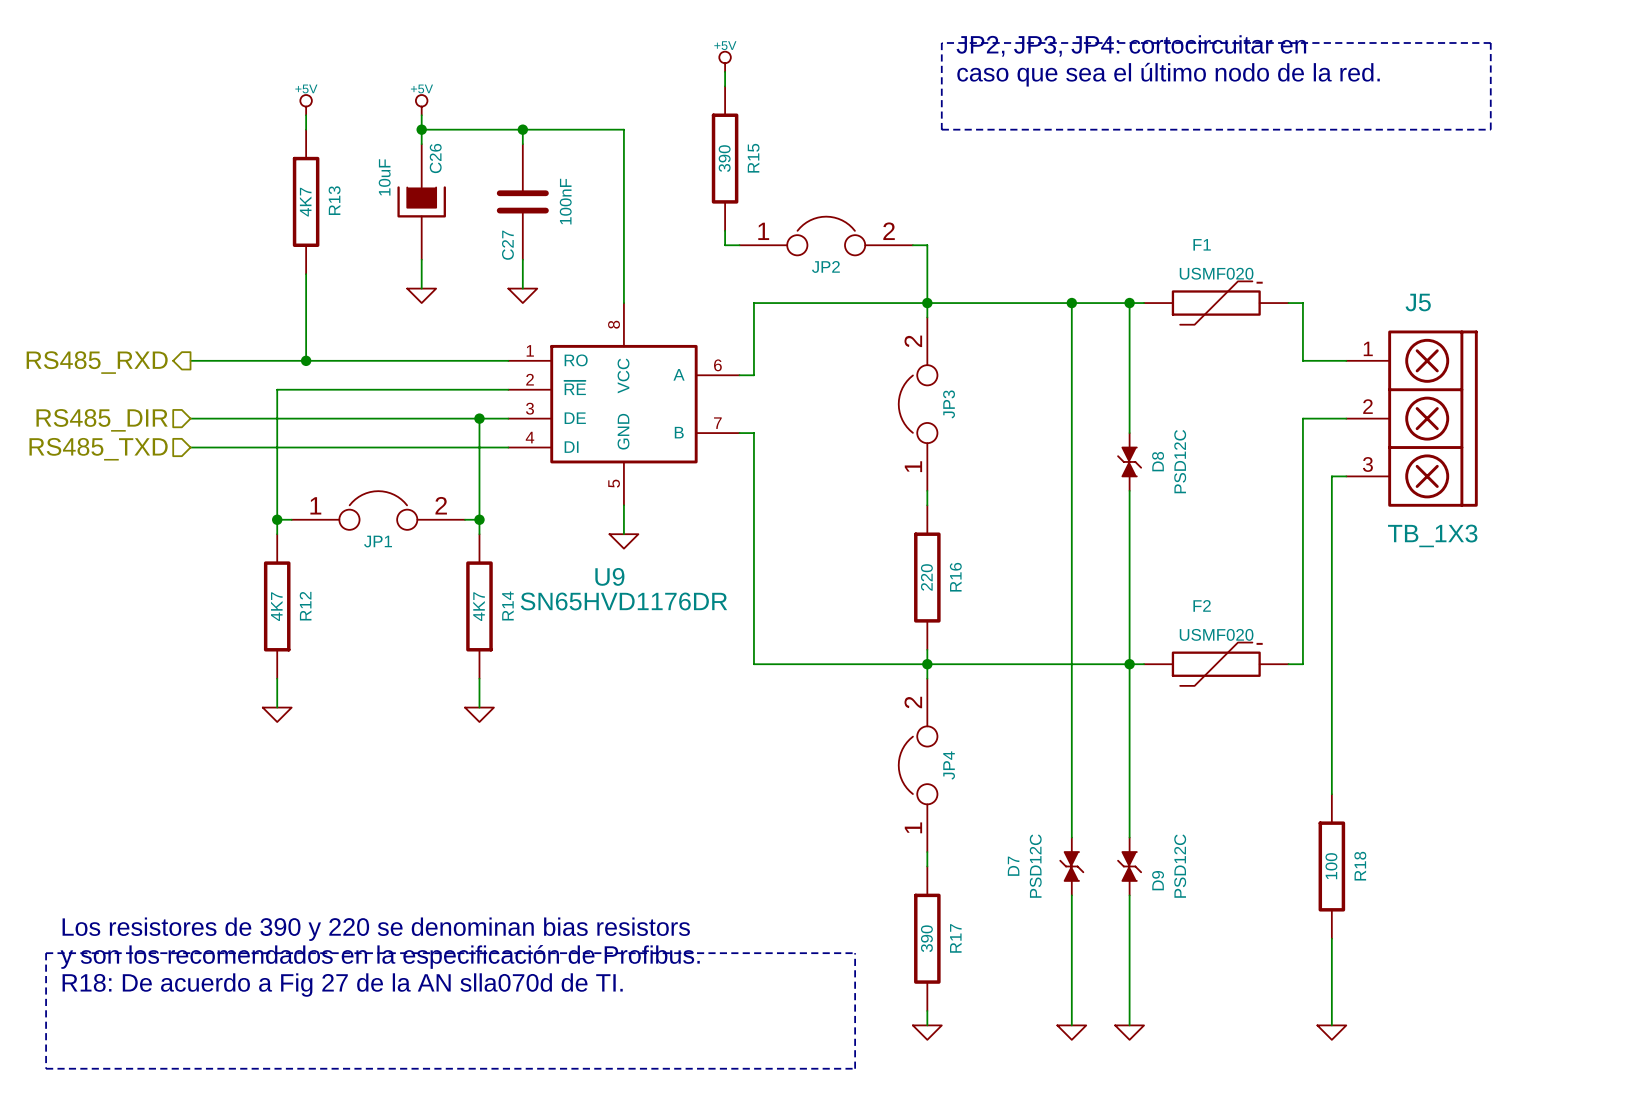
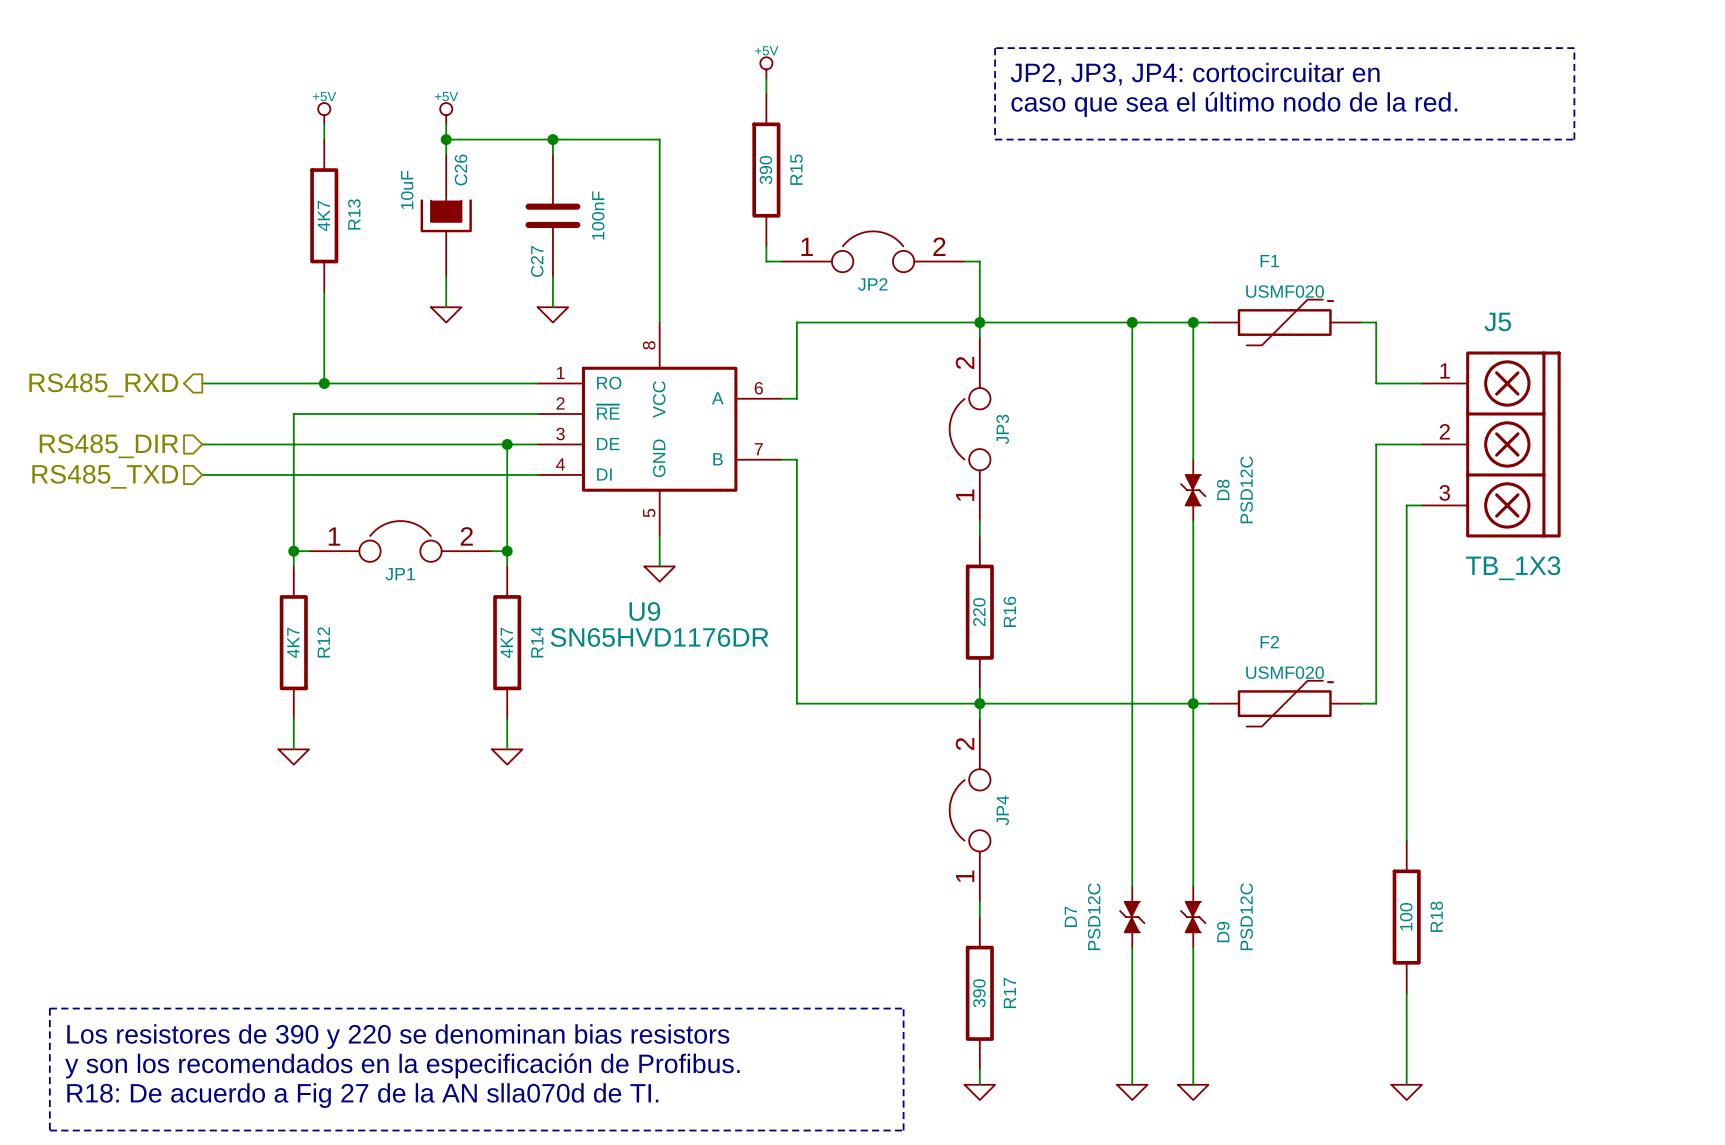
text position: JP2, JP3, JP4: cortocircuitar en (1131, 45) -> JP2, JP3, JP4: cortocircuitar en (1195, 74)
text position: caso que sea el último nodo de la red. (1168, 74) -> caso que sea el último nodo de la red. (1234, 104)
text position: Los resistores de 390 y 220 se denominan bias resistors (376, 929) -> Los resistores de 390 y 220 se denominan bias resistors (398, 1036)
text position: y son los recomendados en la especificación de Profibus. (380, 956) -> y son los recomendados en la especificación de Profibus. (402, 1065)
text position: R18: De acuerdo a Fig 27 de la AN slla070d de TI. (342, 985) -> R18: De acuerdo a Fig 27 de la AN slla070d de TI. (362, 1095)

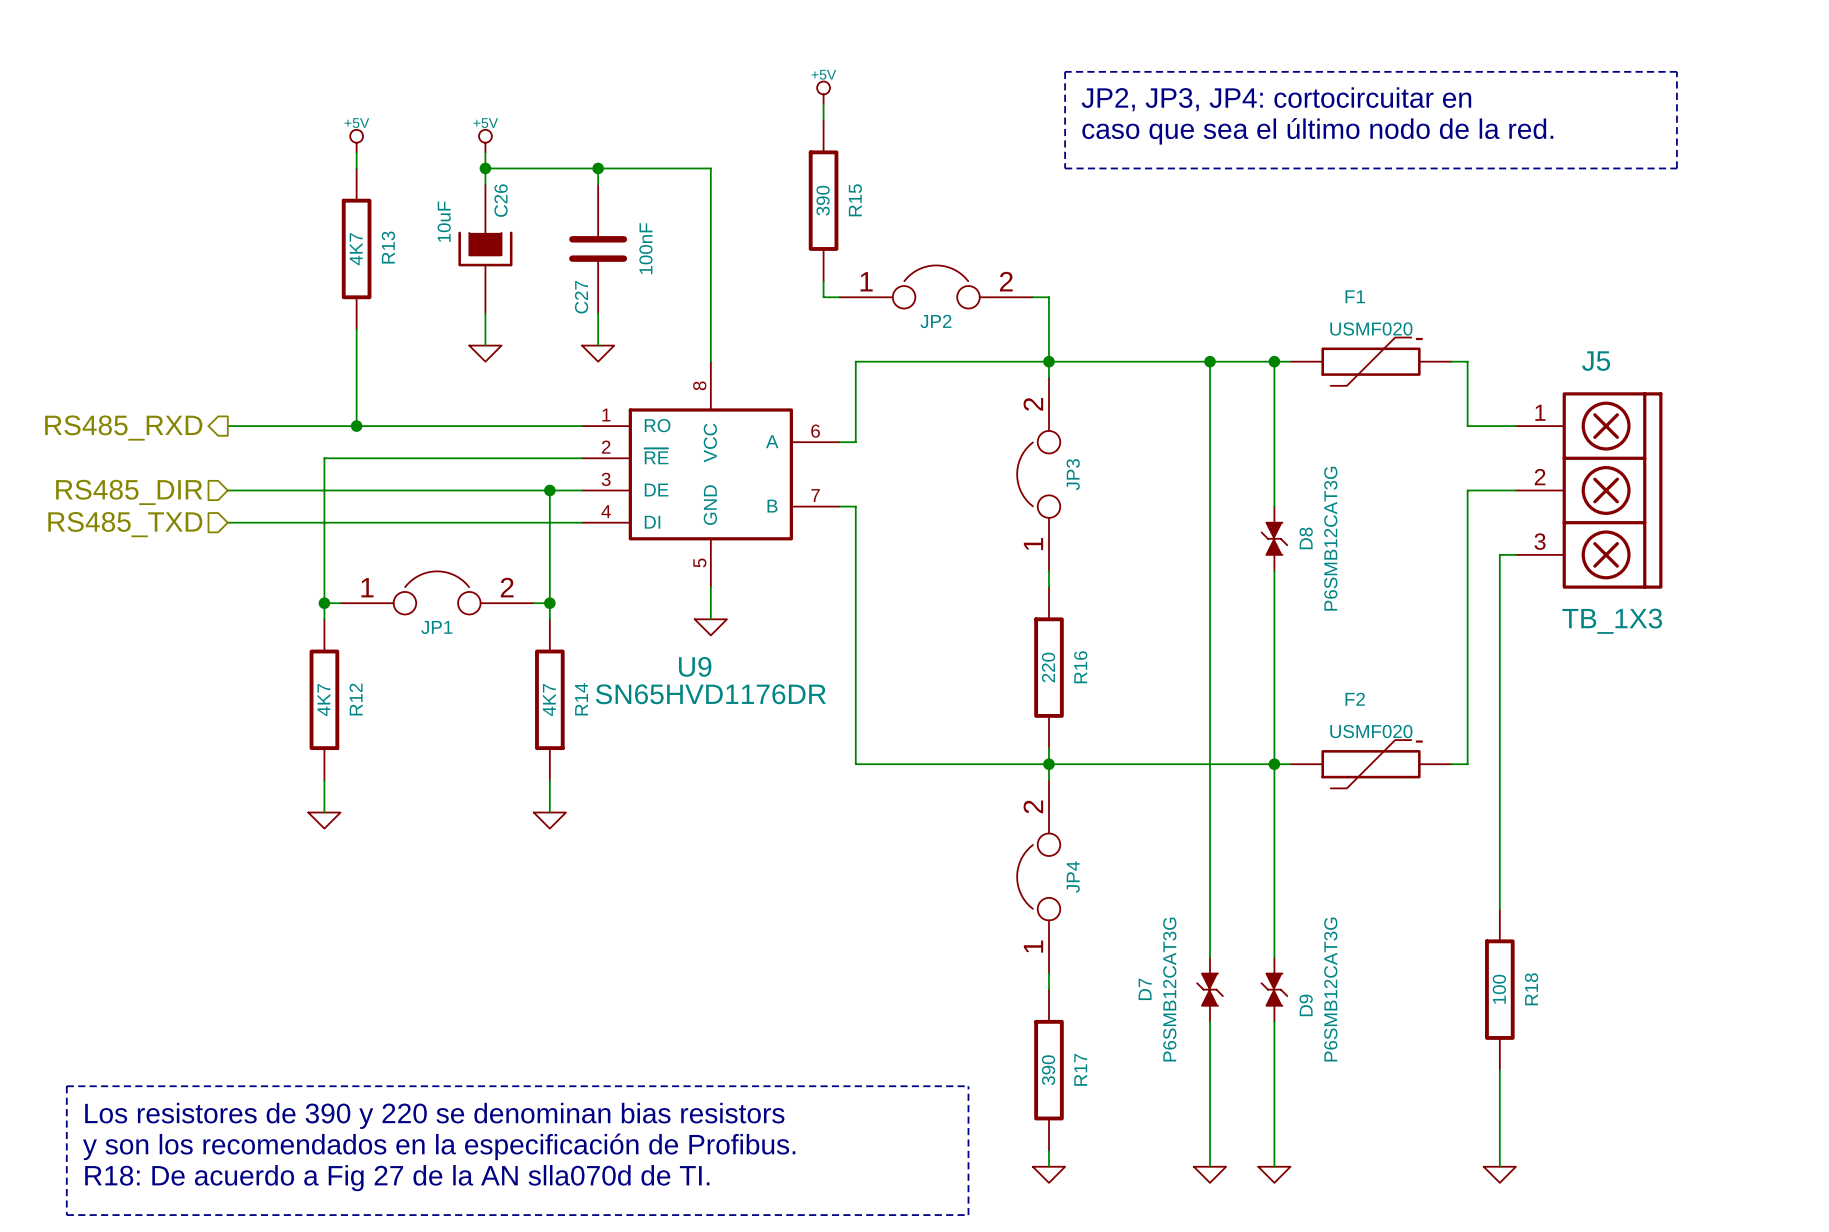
D8 value: PSD12C (1246, 489) -> P6SMB12CAT3G (1330, 538)
D7 value: PSD12C (1094, 916) -> P6SMB12CAT3G (1169, 989)
D9 value: PSD12C (1246, 916) -> P6SMB12CAT3G (1330, 989)

